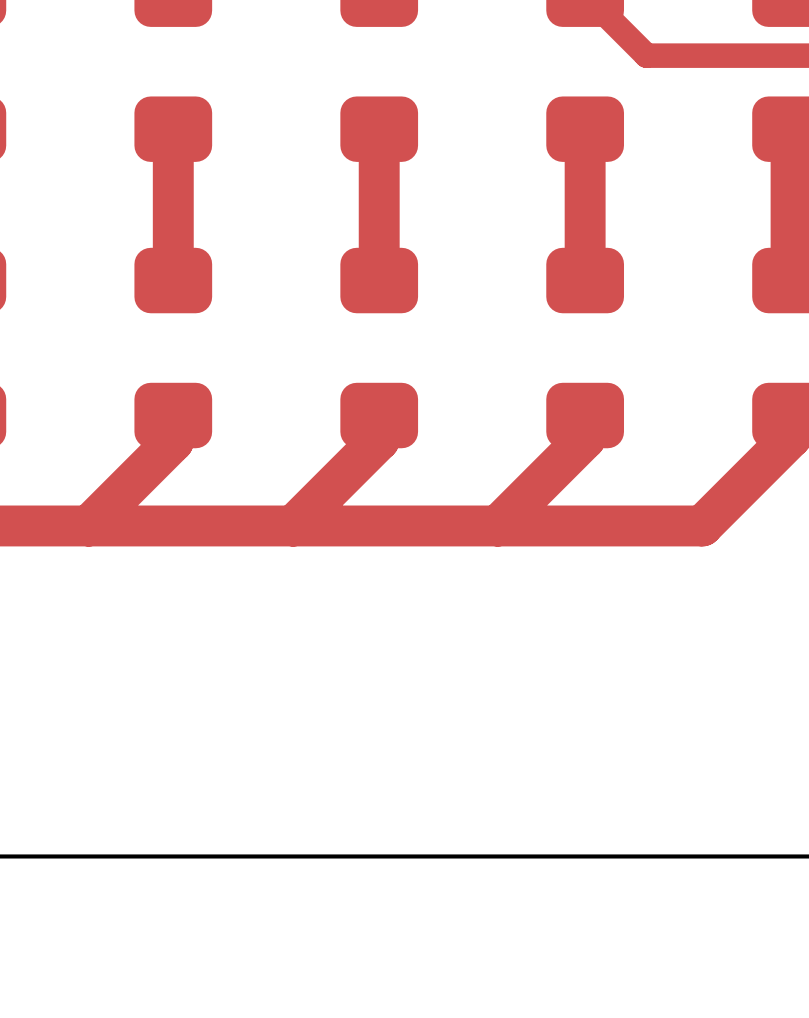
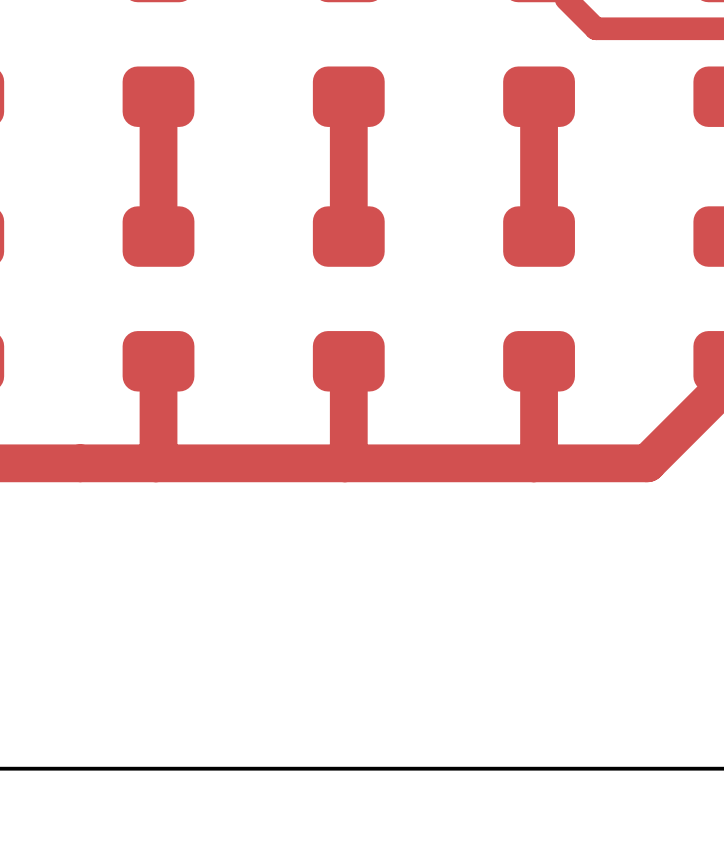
top track: (585, 438) (497, 525) -> (539, 382) (539, 458) (533, 463)
top track: (379, 439) (293, 525) -> (348, 383) (348, 459) (344, 463)
top track: (173, 441) (88, 525) -> (158, 385) (158, 460) (155, 463)

